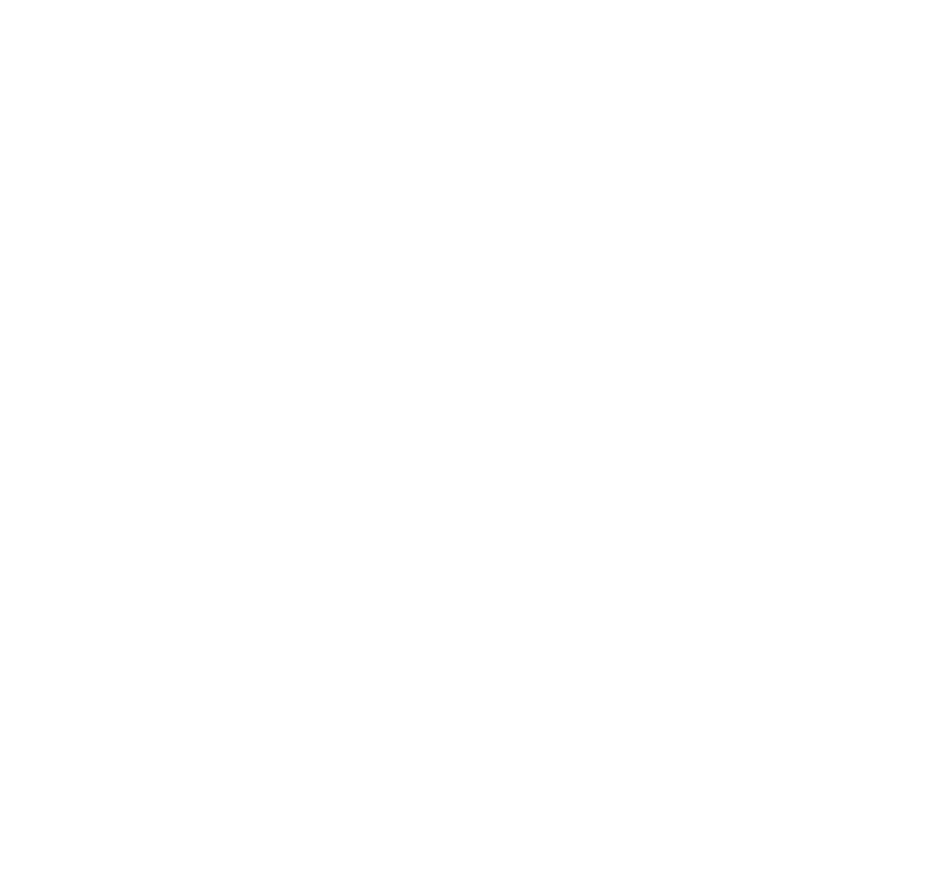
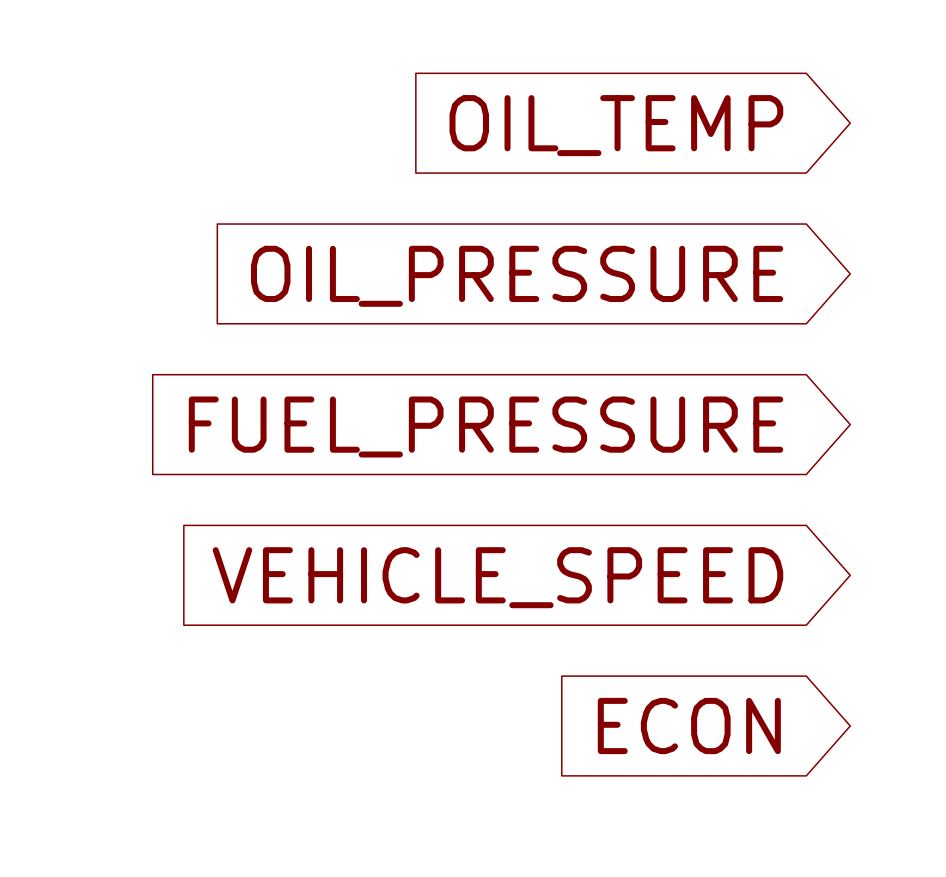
global label: none -> OIL_TEMP (616, 125)
global label: none -> OIL_PRESSURE (517, 276)
global label: none -> FUEL_PRESSURE (486, 426)
global label: none -> VEHICLE_SPEED (497, 577)
global label: none -> ECON (689, 726)

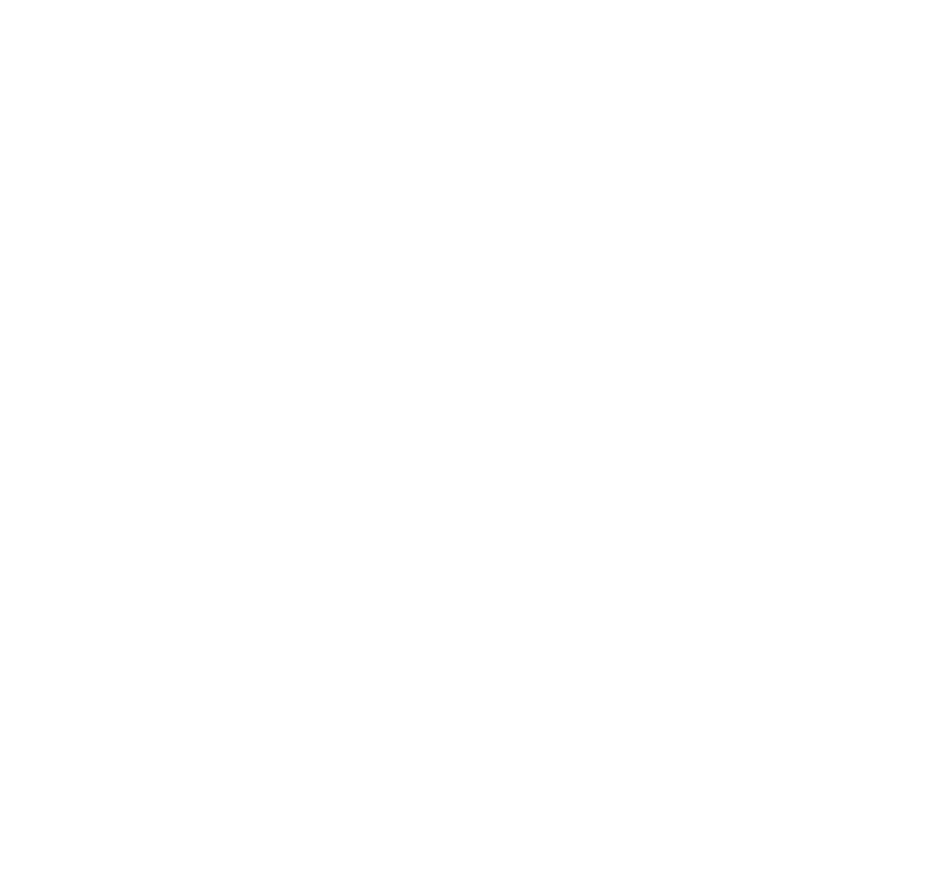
global label: OIL_TEMP (616, 125) -> none
global label: OIL_PRESSURE (517, 276) -> none
global label: FUEL_PRESSURE (486, 426) -> none
global label: VEHICLE_SPEED (497, 577) -> none
global label: ECON (689, 726) -> none

